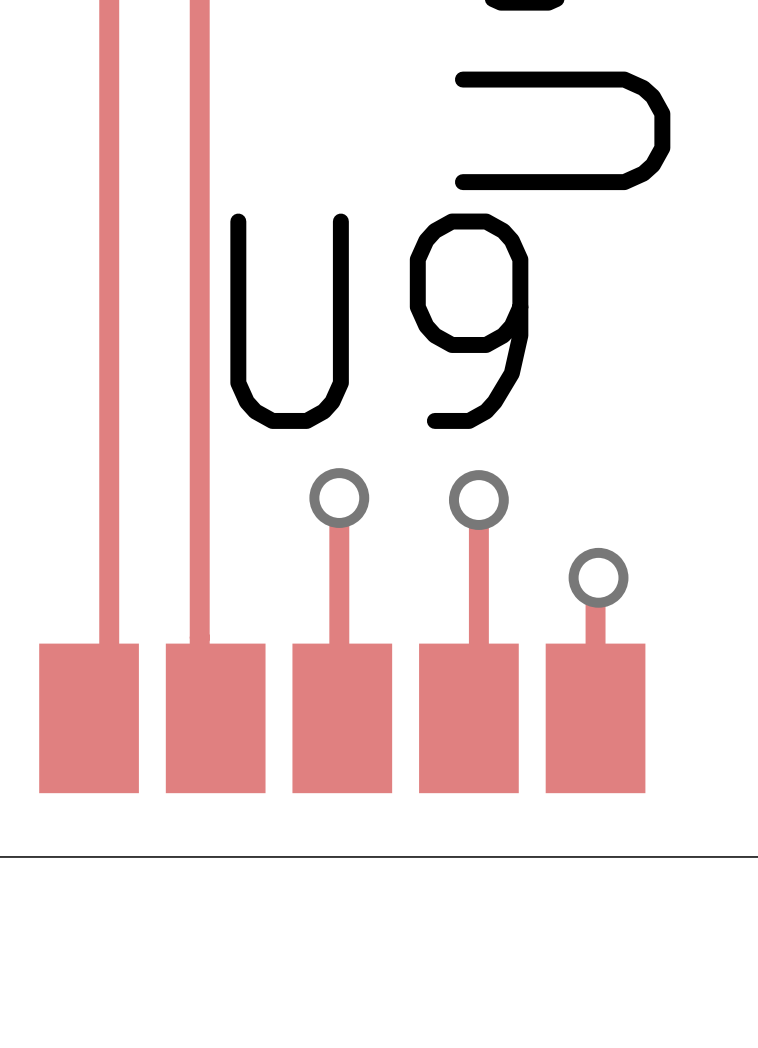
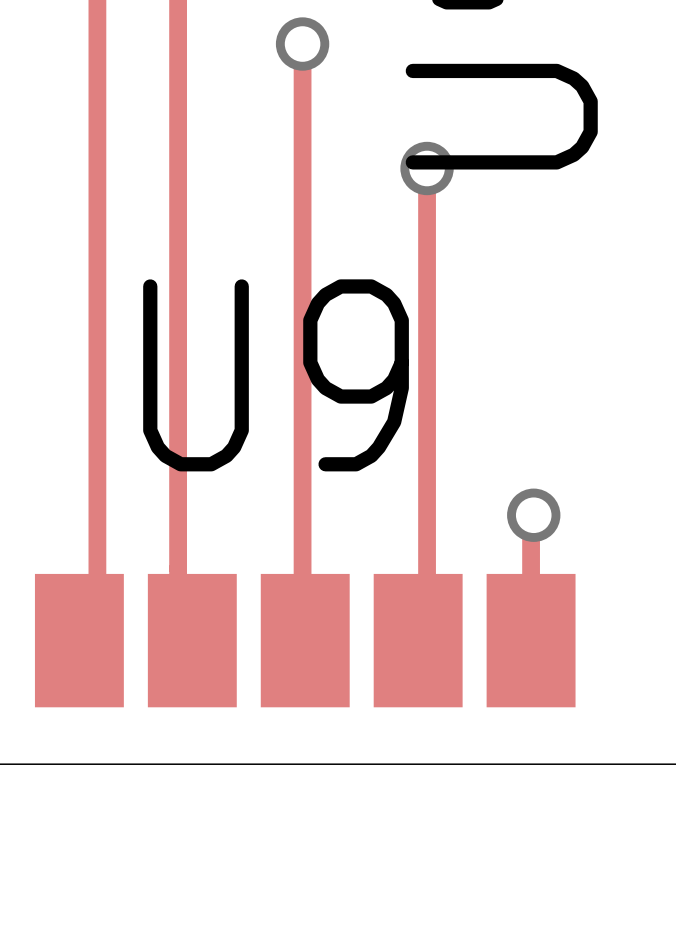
track: none -> (302, 44) (302, 444)
via: none -> (302, 44)
track: none -> (427, 168) (427, 445)
via: none -> (427, 168)
text position: U9 (379, 321) -> U9 (276, 375)
via: (339, 498) -> none
via: (478, 500) -> none

